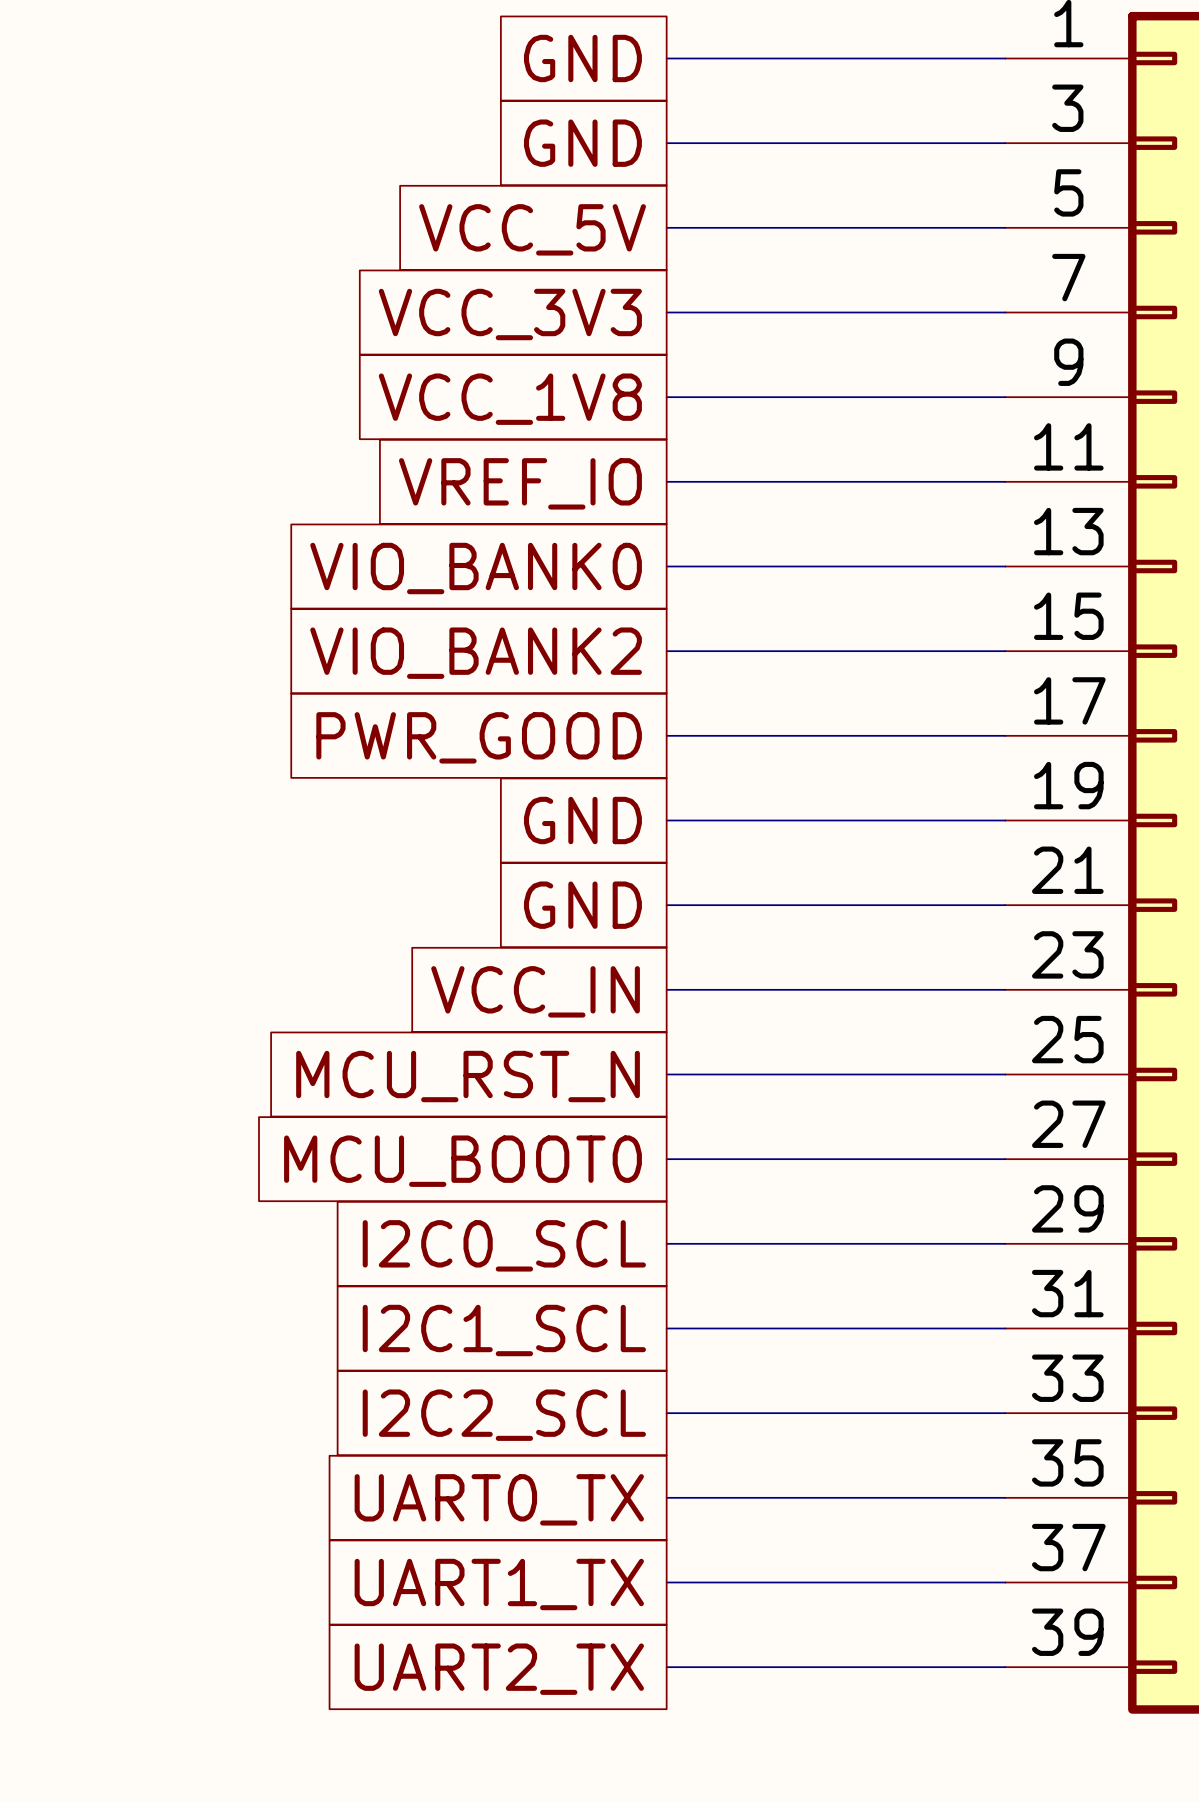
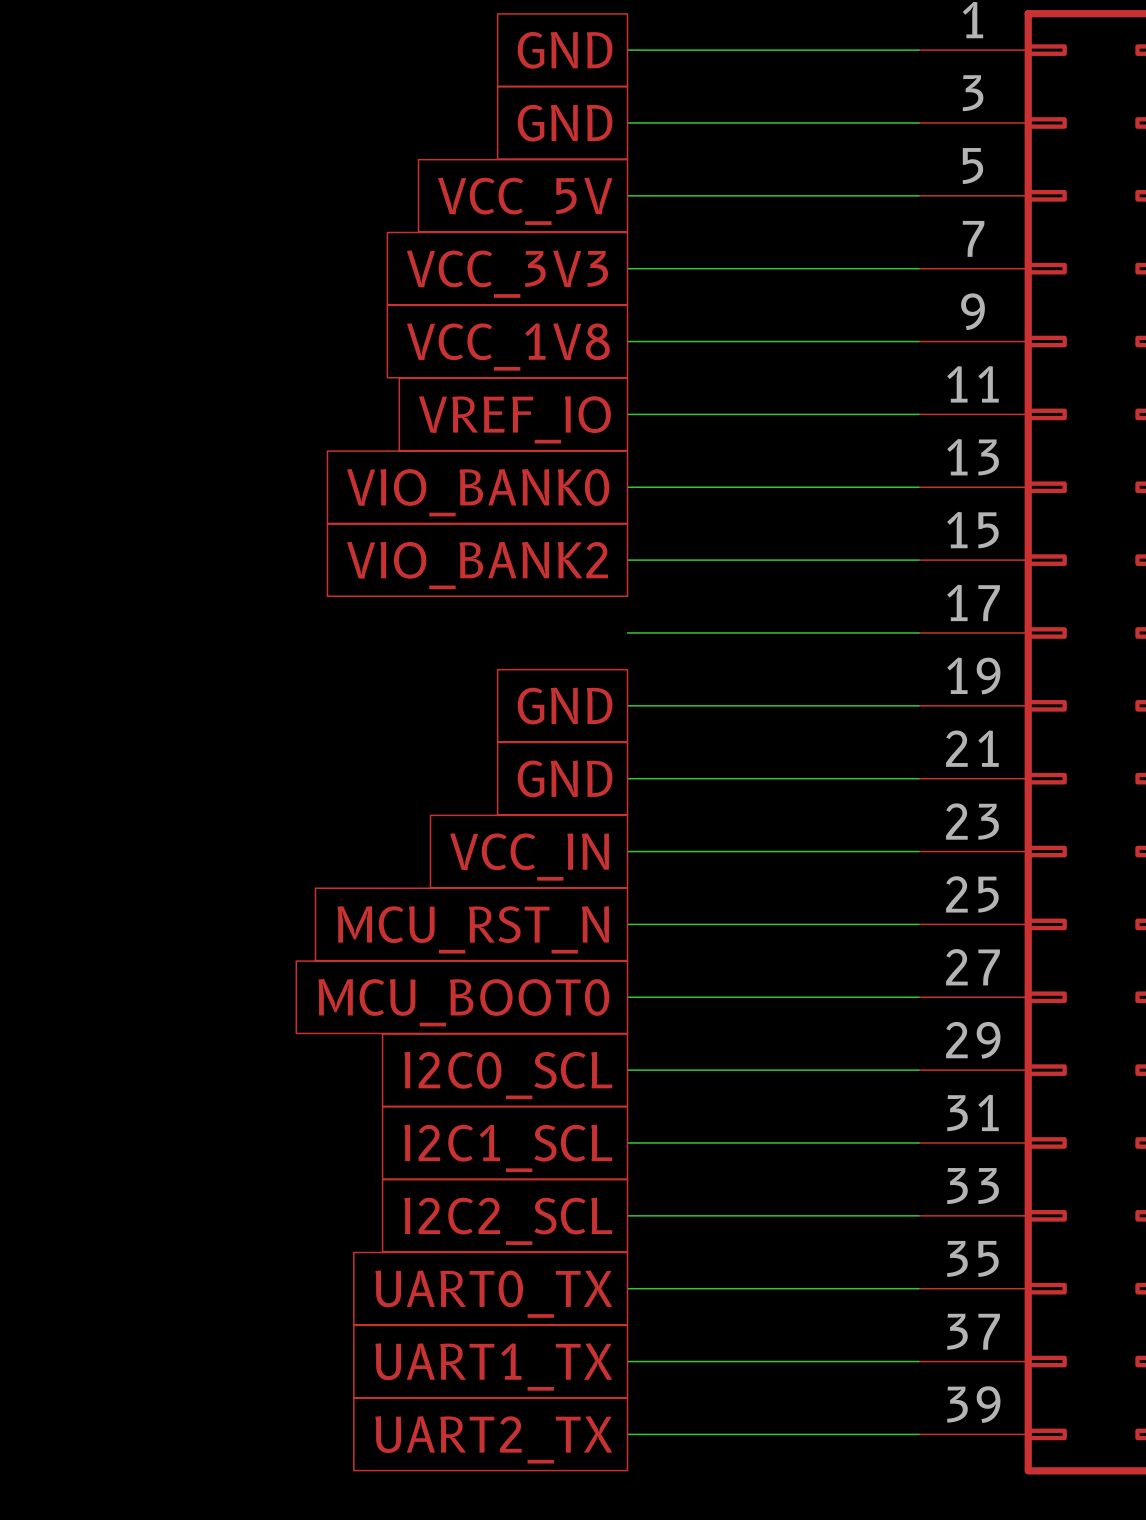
global label: PWR_GOOD (479, 737) -> none

